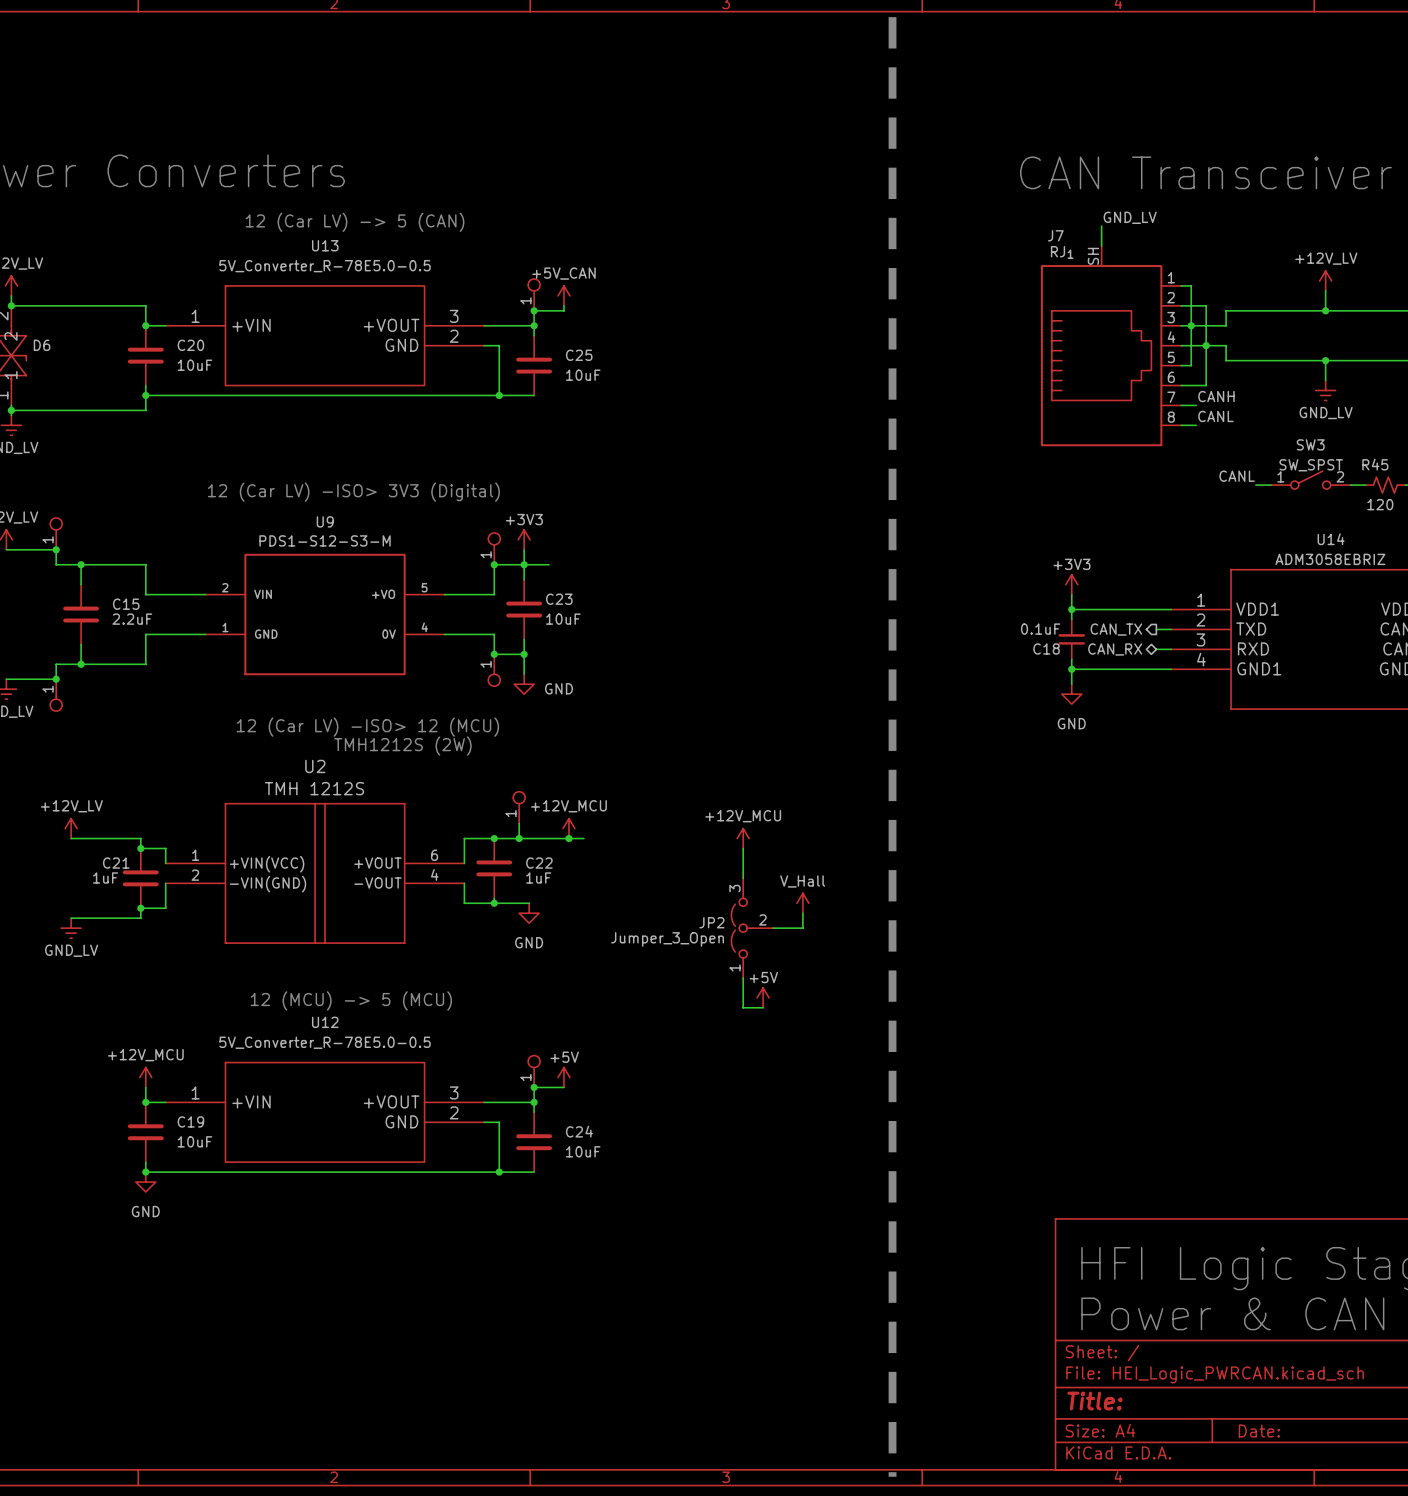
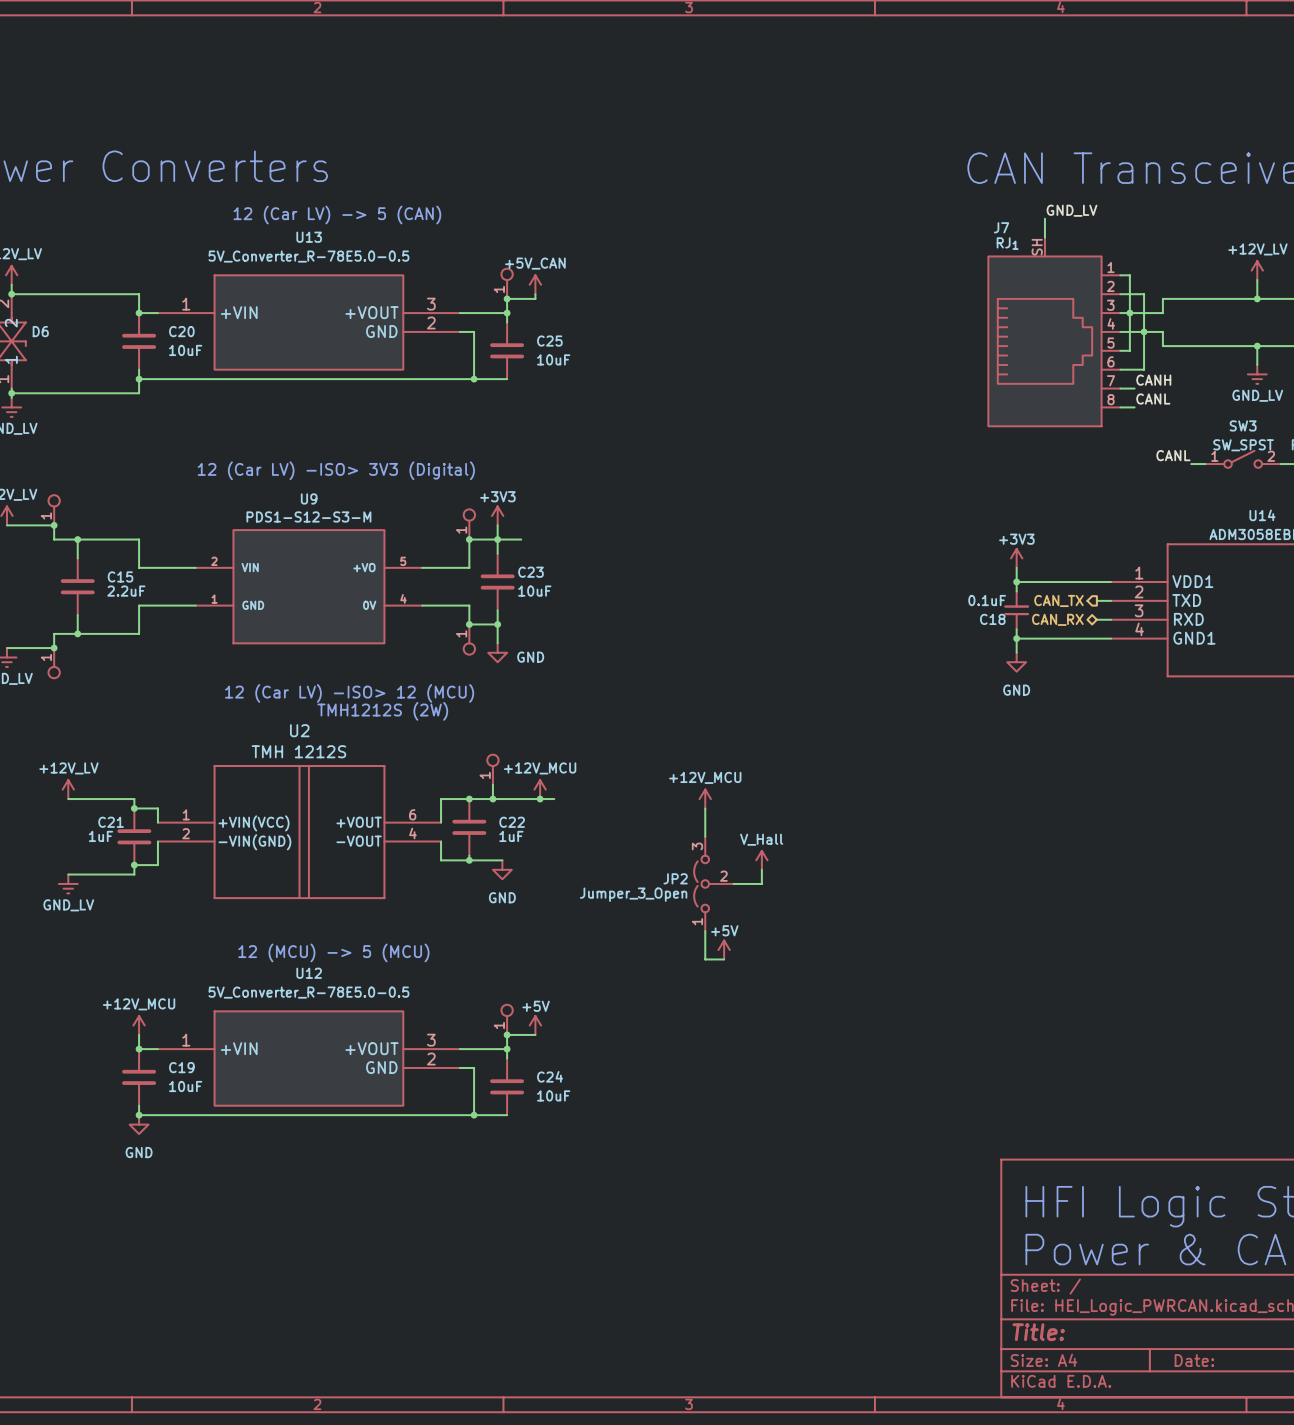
line: (892, 17) (892, 1476) -> none

